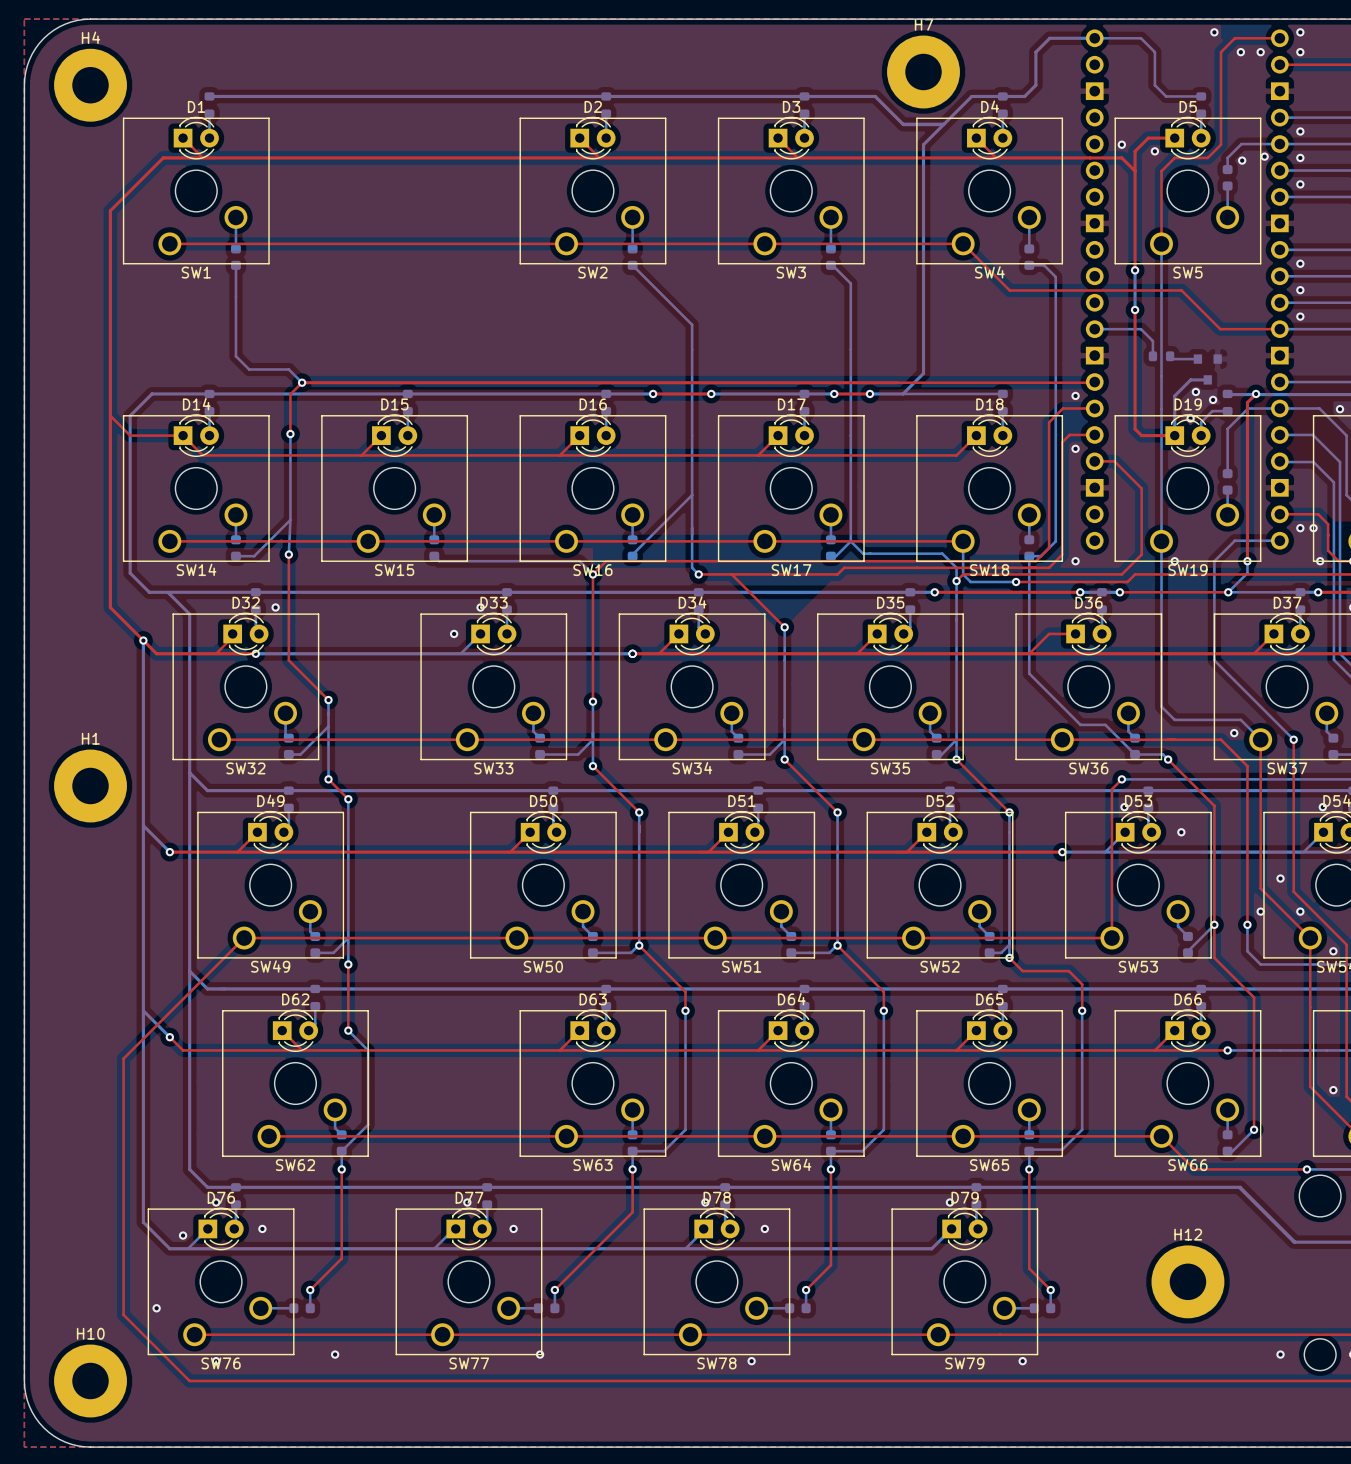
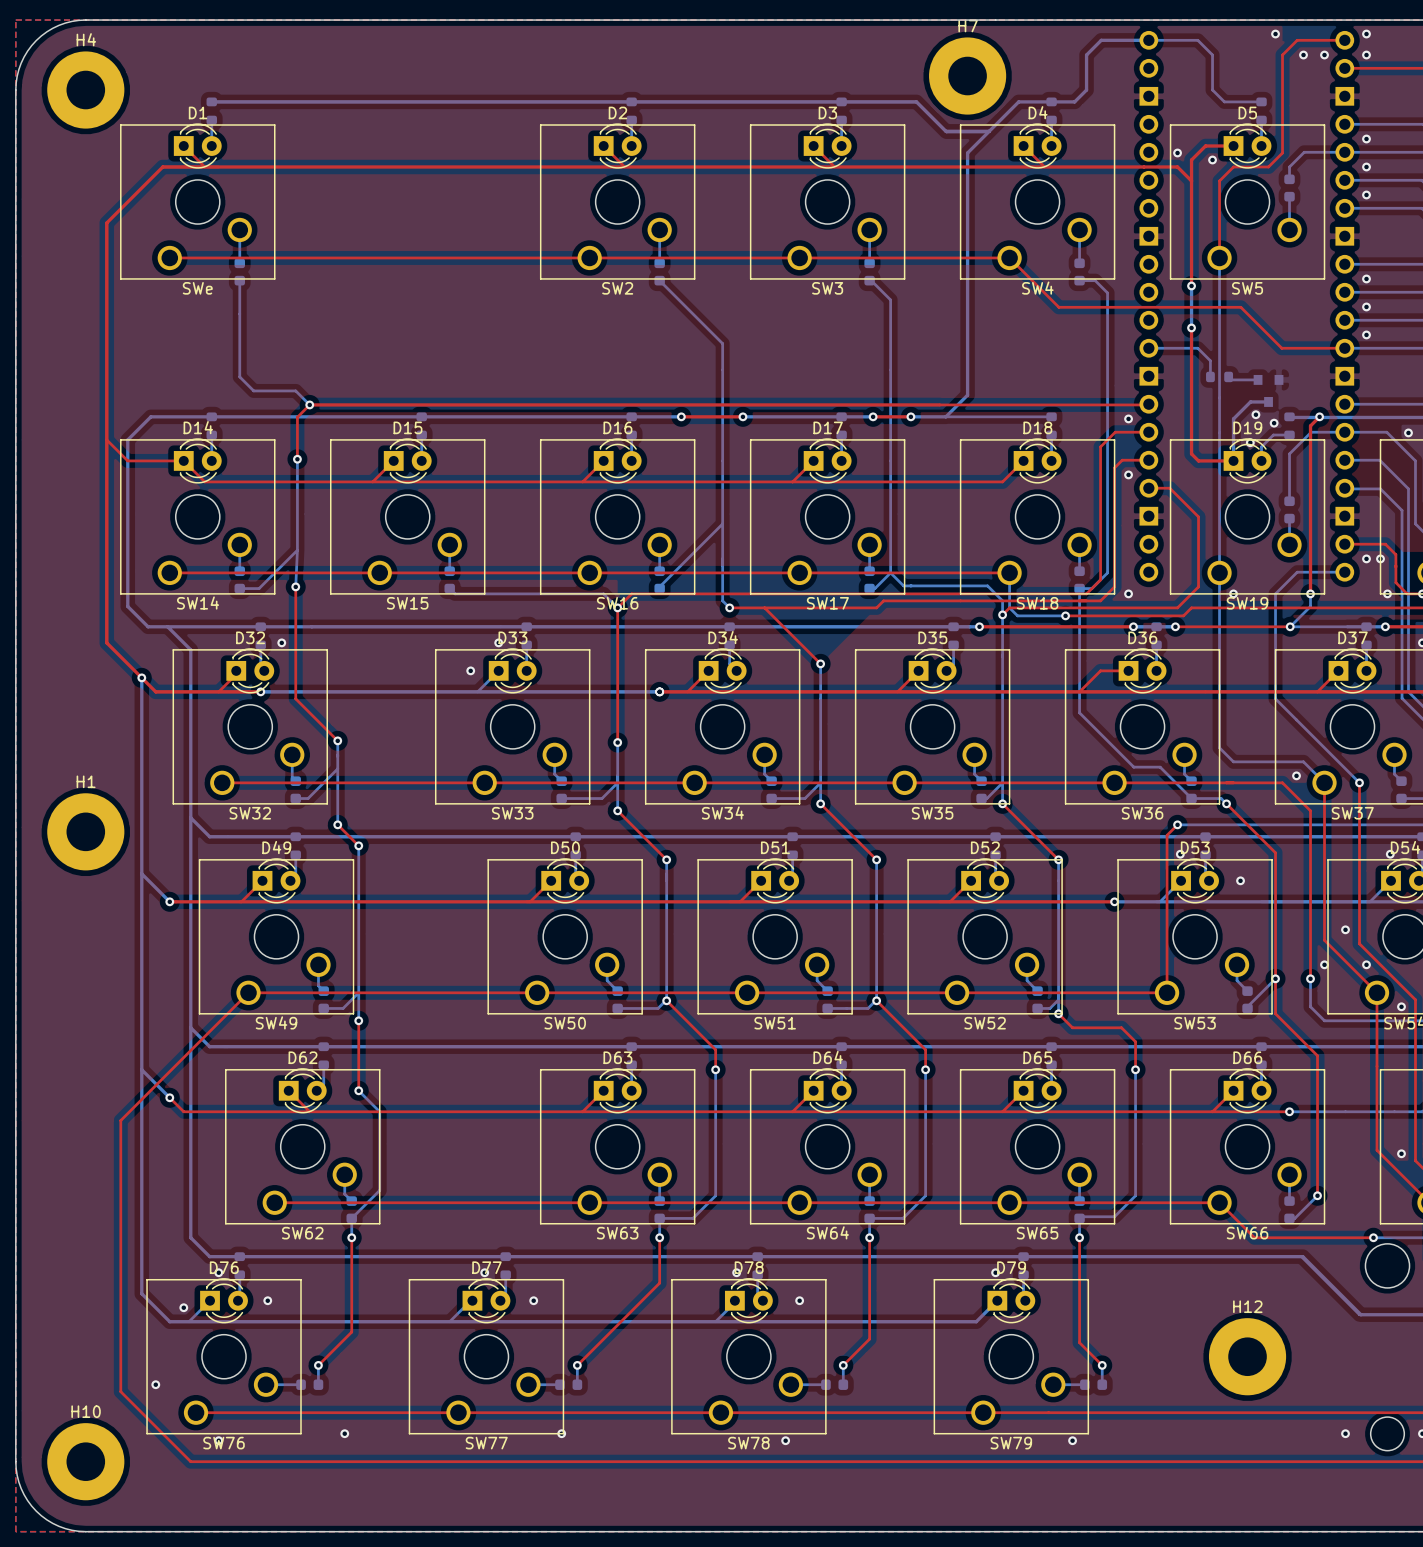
via: (1264, 156) -> none
via: (1242, 160) -> none
SW1 name: SW1 (196, 272) -> SWe (197, 288)

